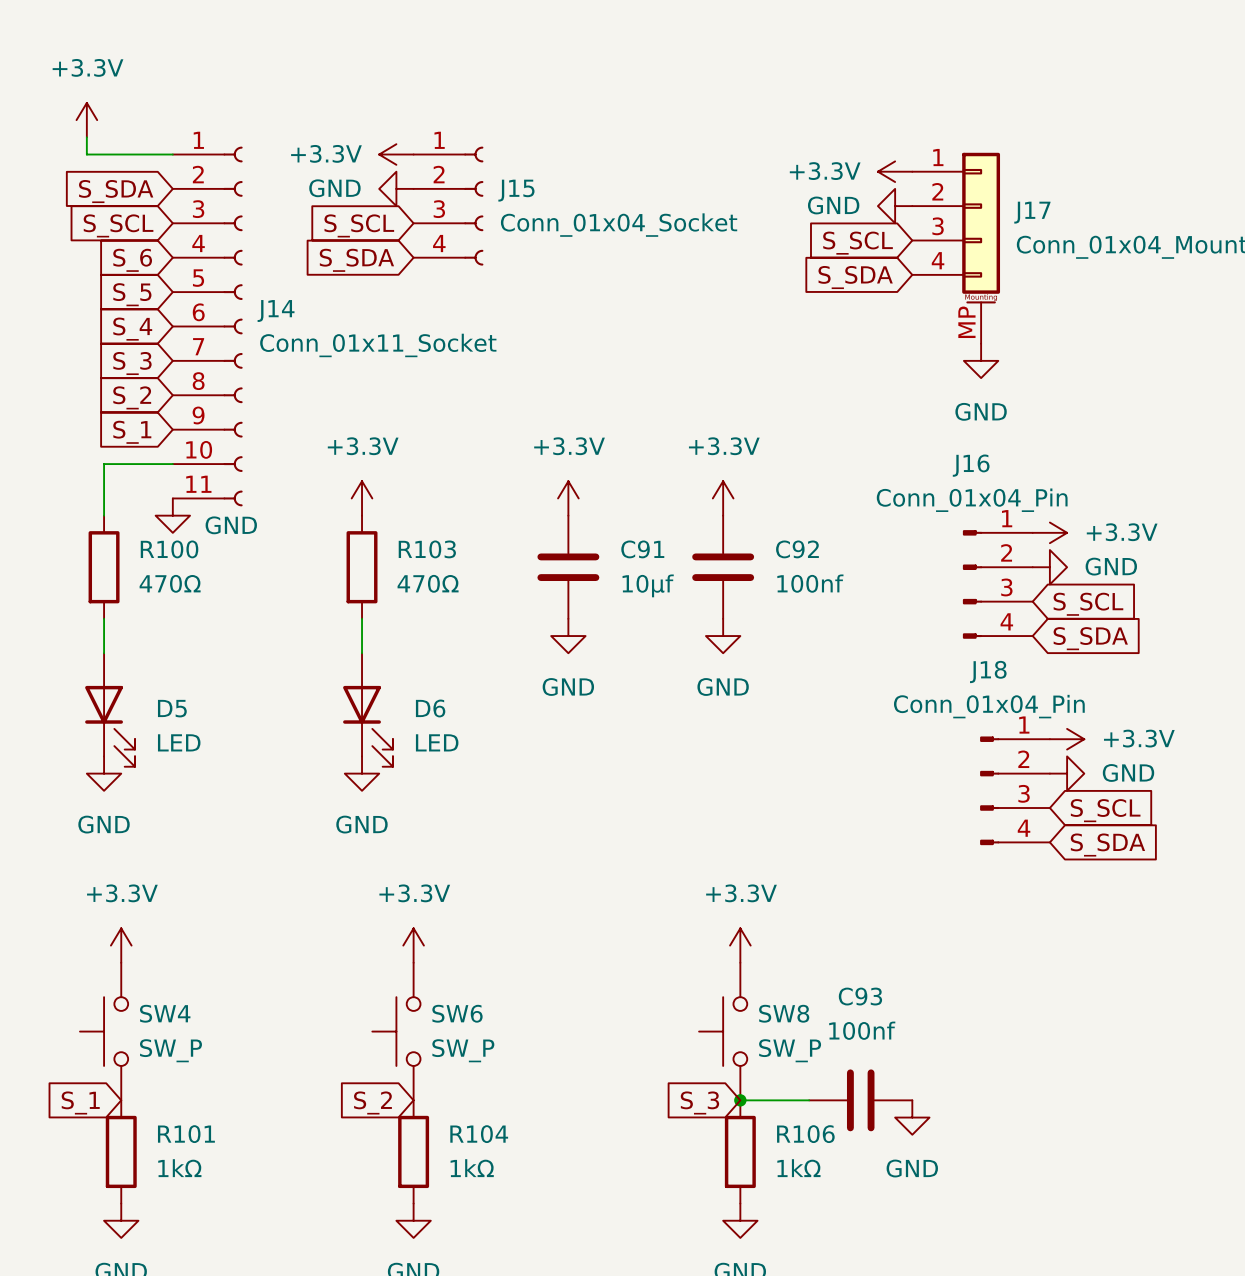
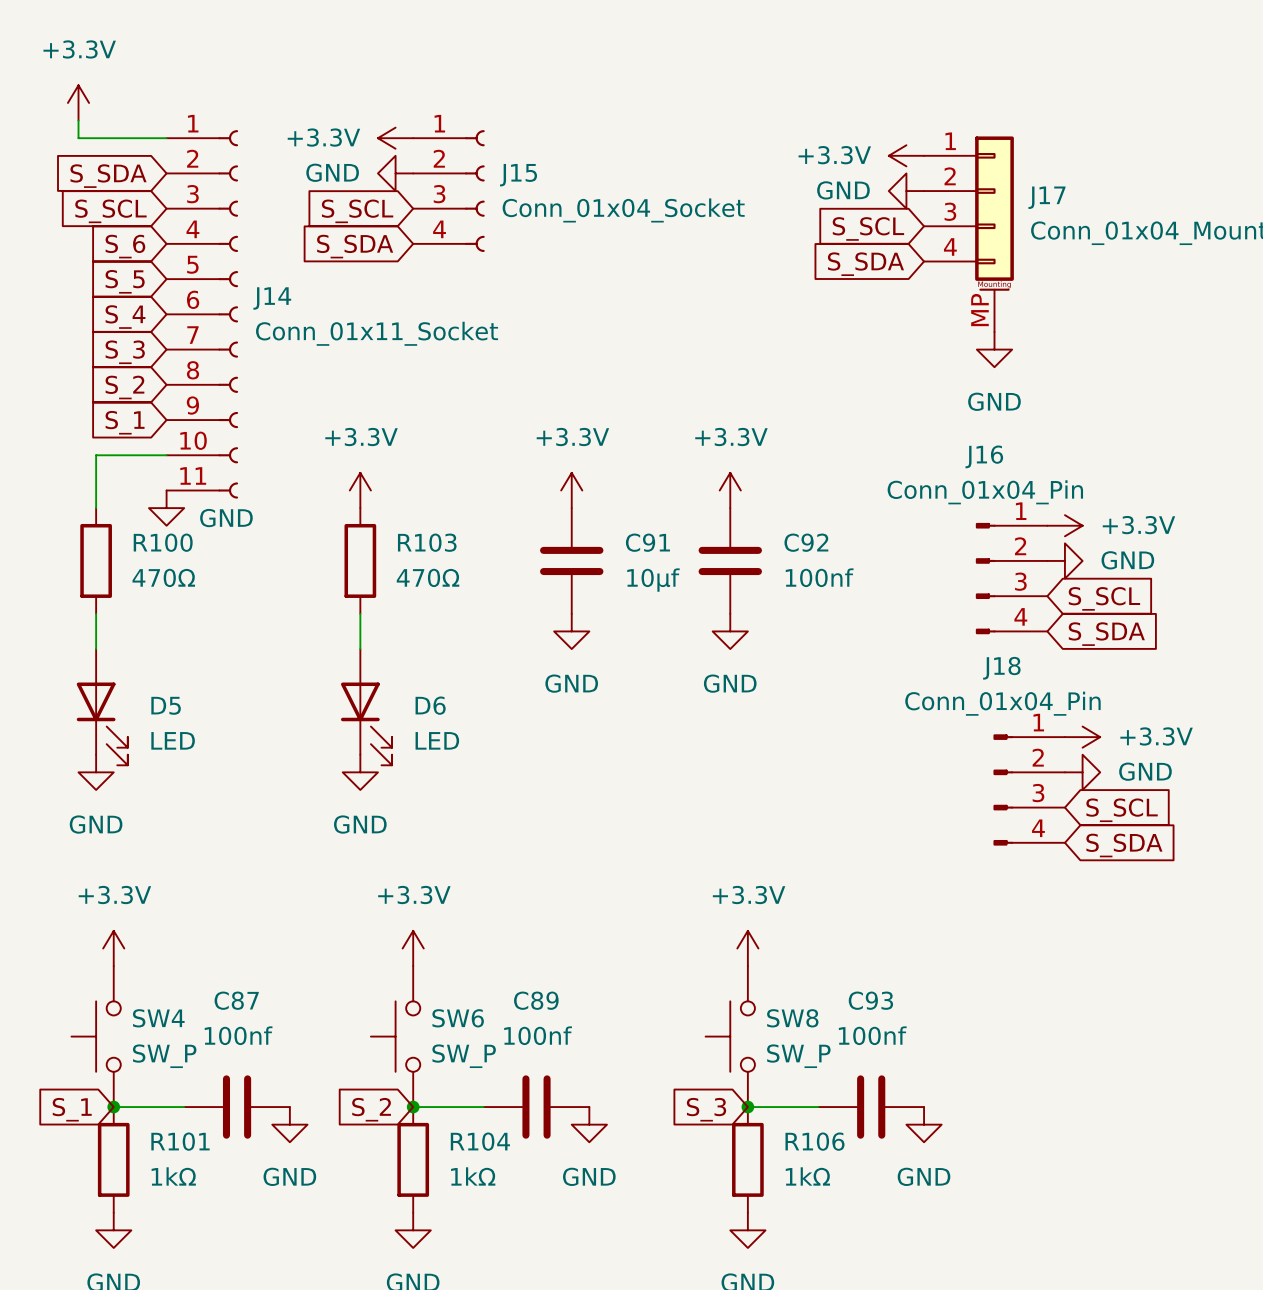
wire: none -> (113, 1107) (184, 1107)
junction: none -> (113, 1107)
C87: none -> 100nf (237, 1107)
wire: none -> (413, 1107) (483, 1107)
junction: none -> (413, 1107)
C89: none -> 100nf (536, 1107)
power symbol: none -> GND (289, 1124)
power symbol: none -> GND (589, 1124)

